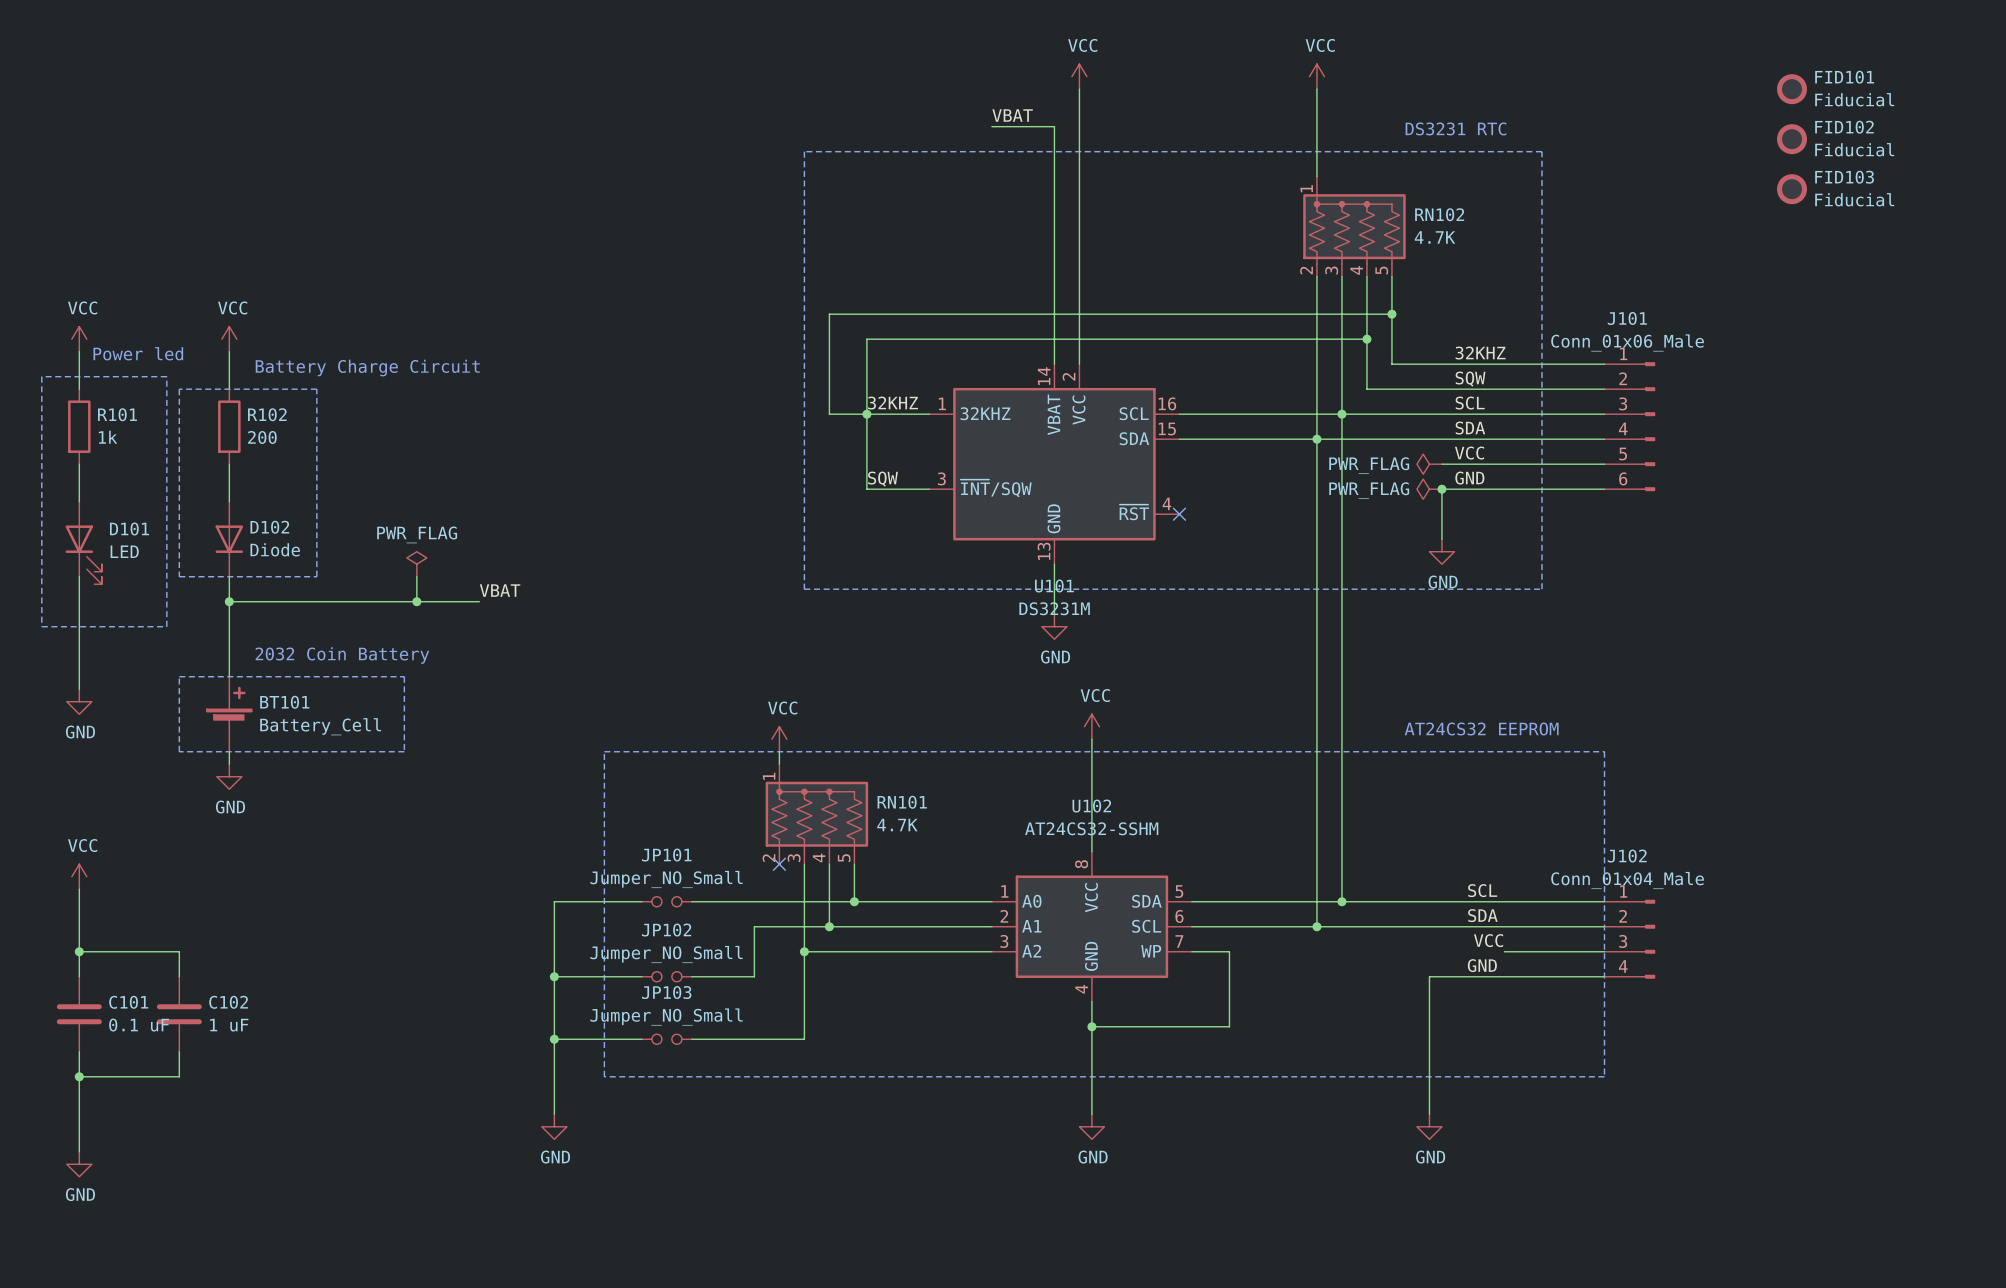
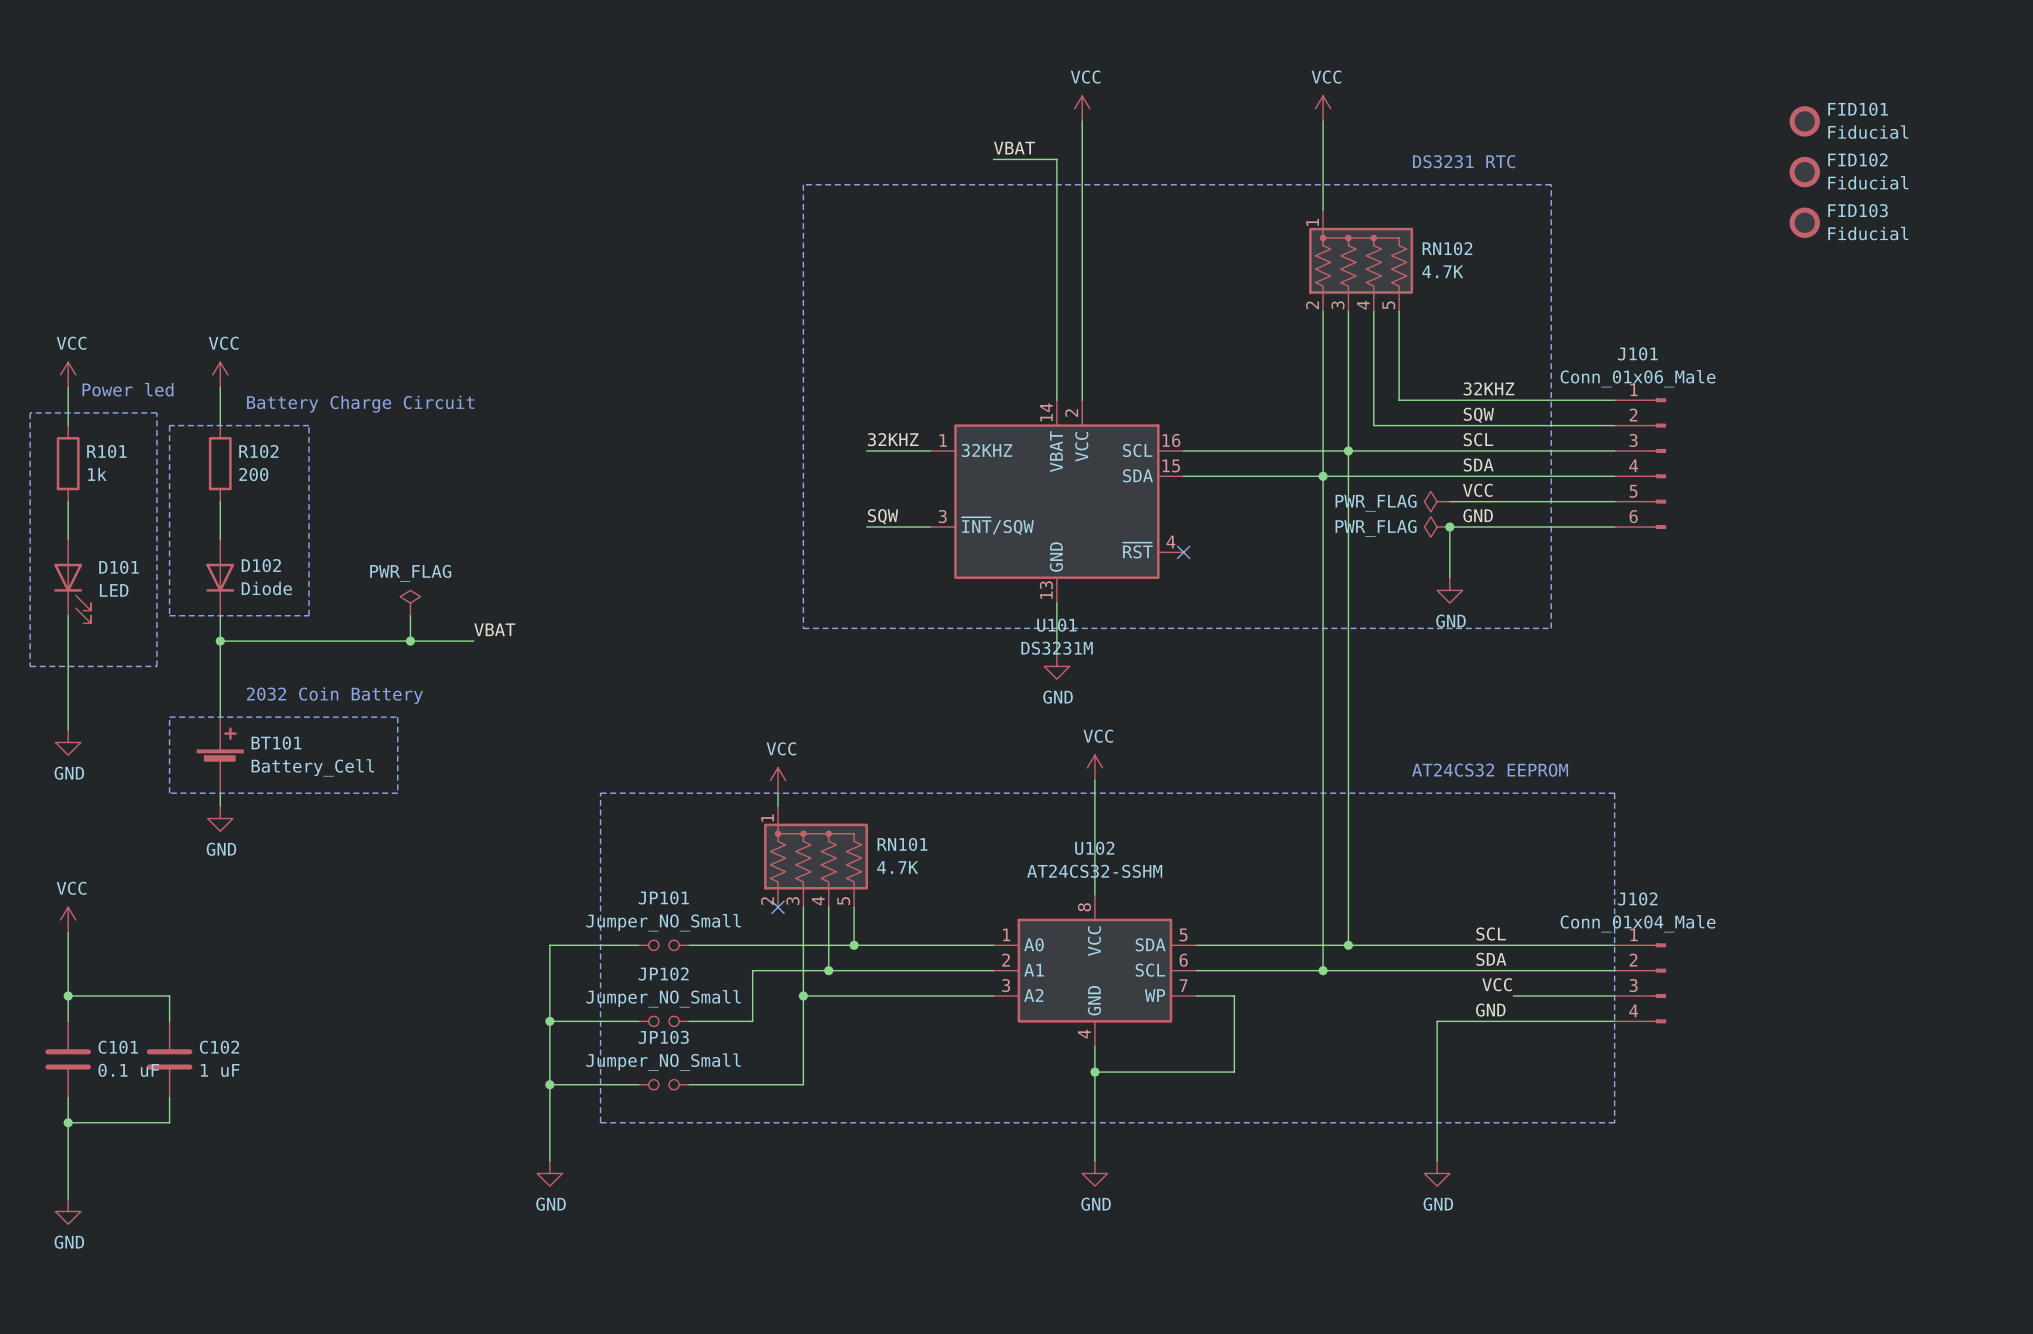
wire: (1391, 314) (829, 314) (829, 414) (866, 414) -> none
junction: (1391, 314) -> none
wire: (1366, 339) (866, 339) (866, 489) -> none
junction: (1366, 339) -> none
junction: (866, 414) -> none

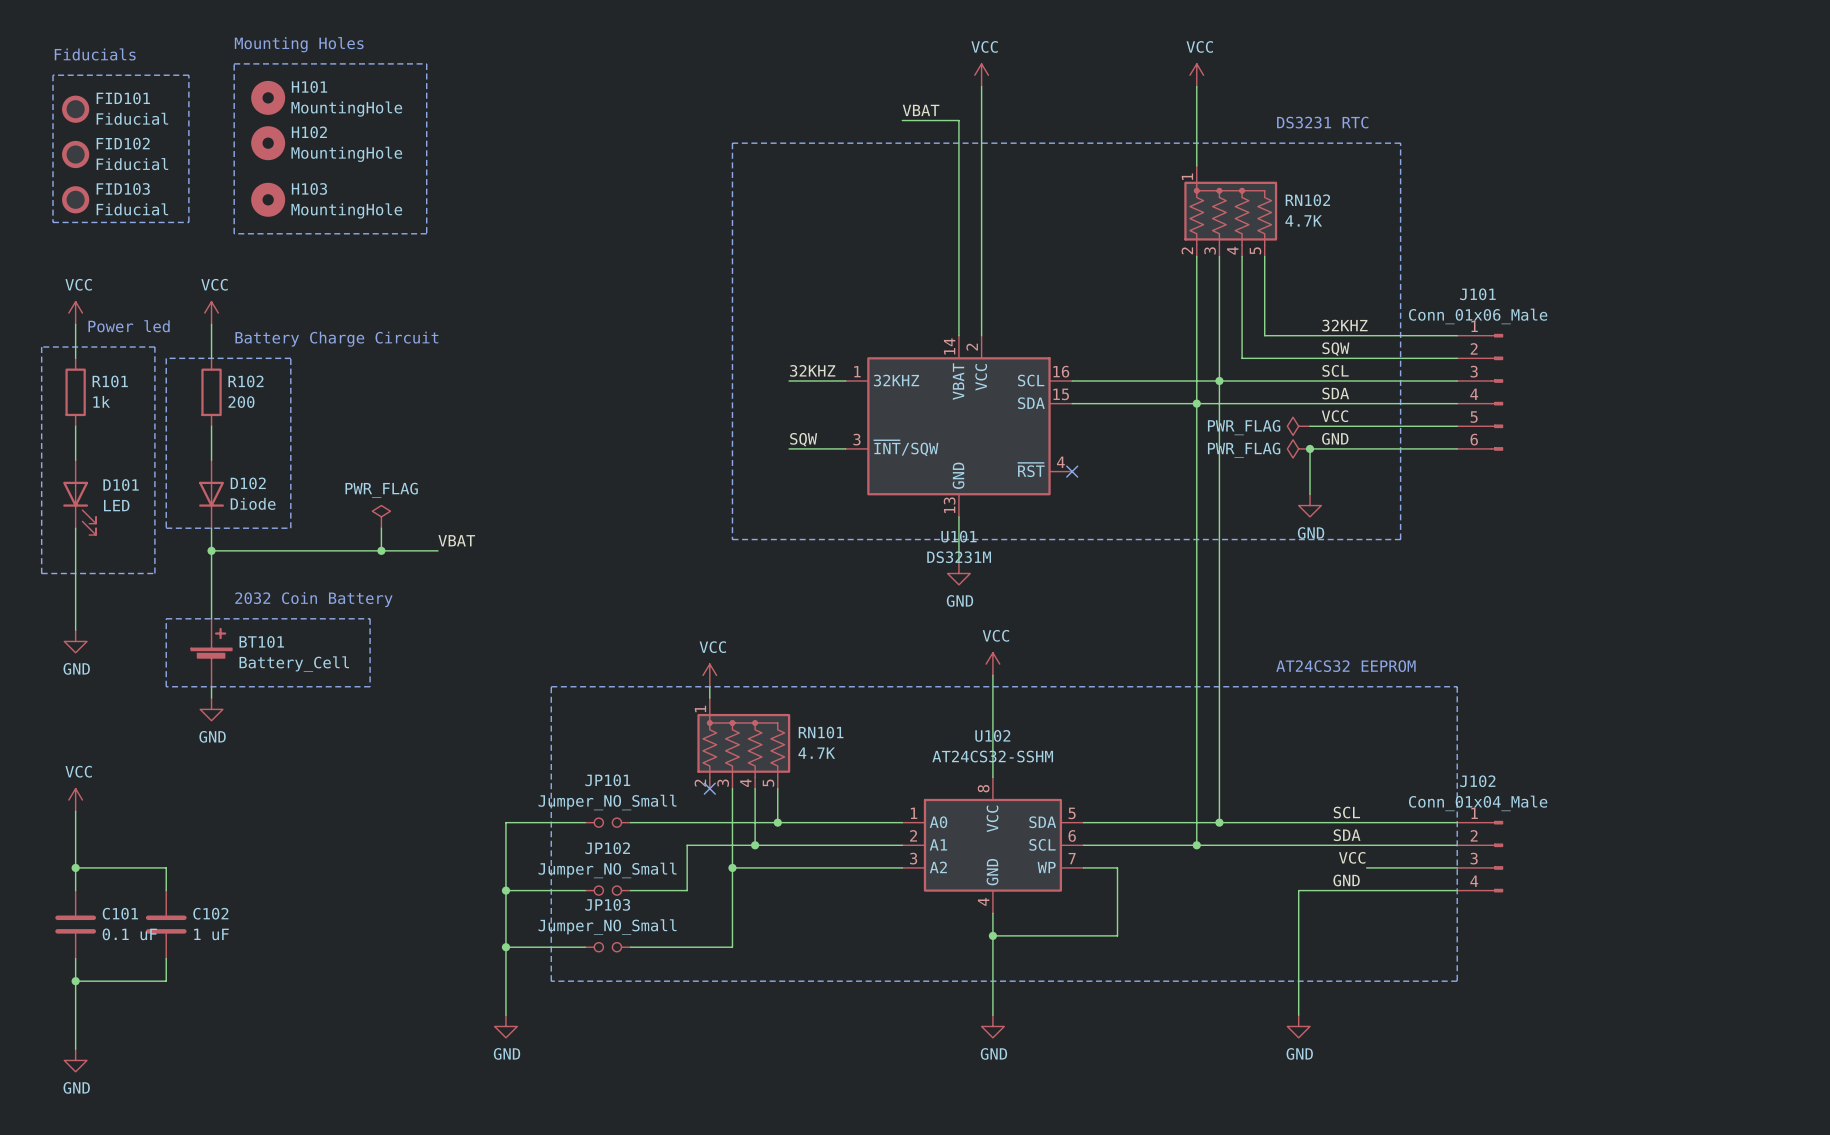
text: none -> Mounting Holes (299, 44)
text: none -> Fiducials (95, 54)
line: none -> (234, 63) (426, 63) (426, 233) (234, 233) (234, 63)
line: none -> (52, 75) (188, 75) (188, 222) (52, 222) (52, 75)
FID101 position: (1804, 121) -> (75, 109)
H101: none -> MountingHole (268, 97)
FID102 position: (1804, 172) -> (75, 154)
H102: none -> MountingHole (268, 143)
FID103 position: (1804, 222) -> (75, 199)
H103: none -> MountingHole (268, 199)

